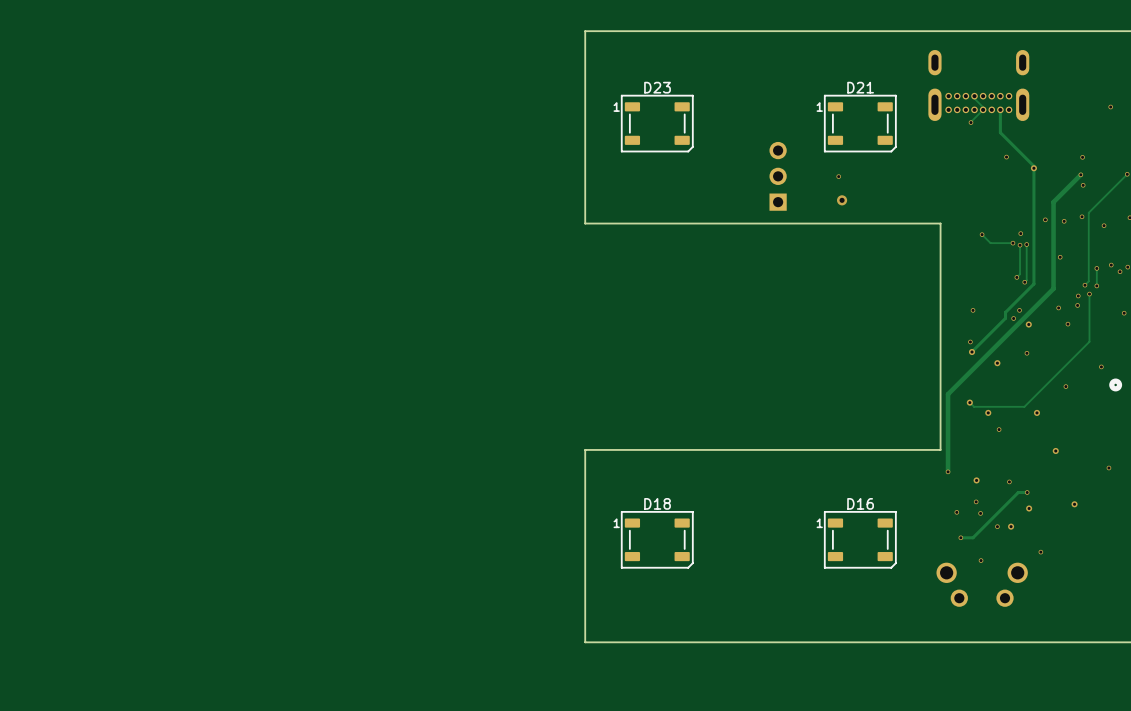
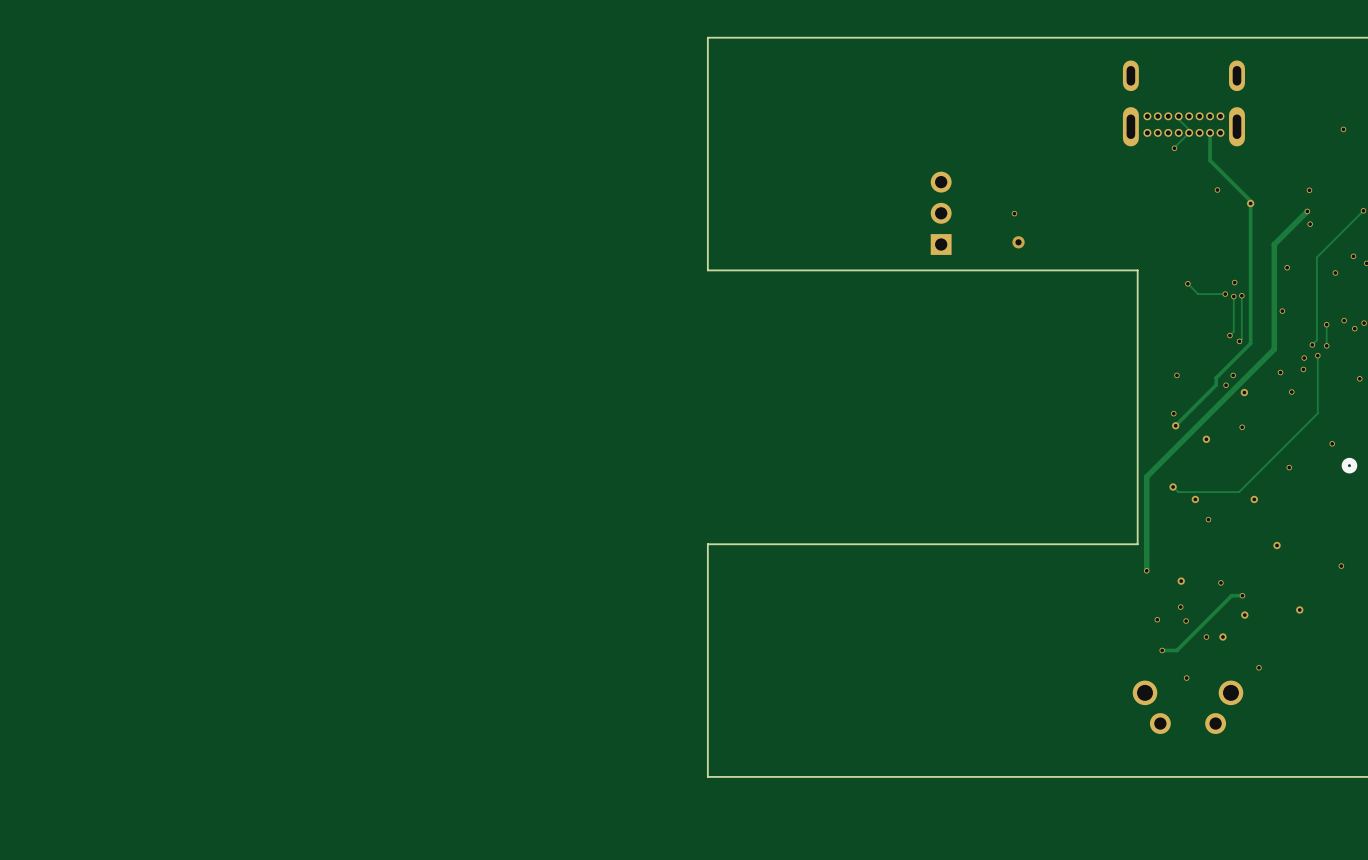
D23: (657, 123) -> none
D21: (860, 123) -> none
via: none -> (1353, 256)
via: (1082, 216) -> none
via: (1045, 219) -> none
D18: (657, 539) -> none
D16: (860, 539) -> none

